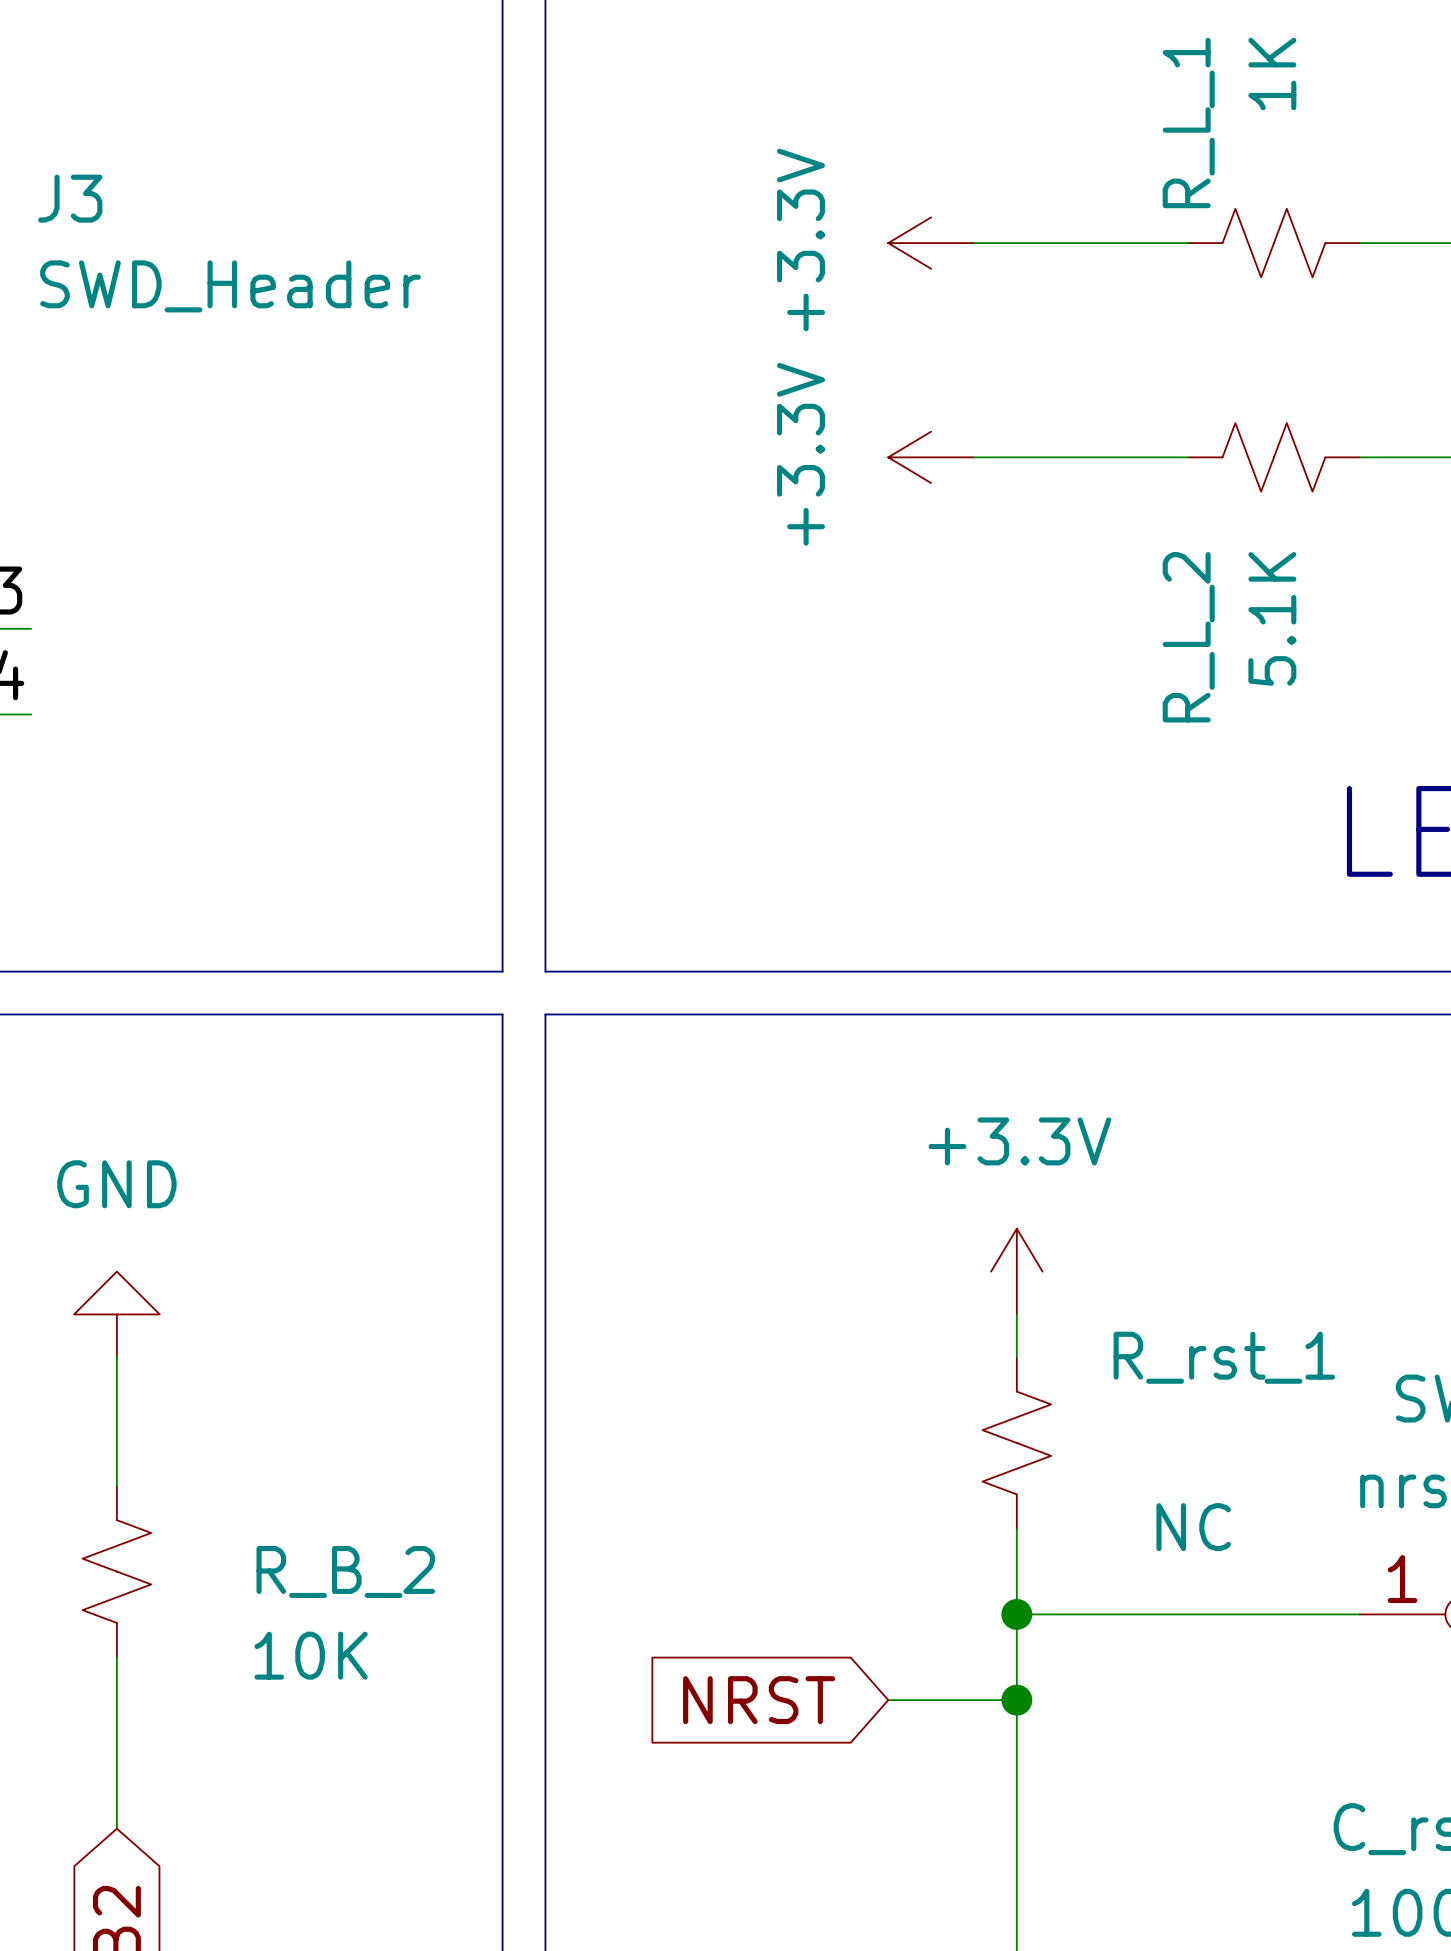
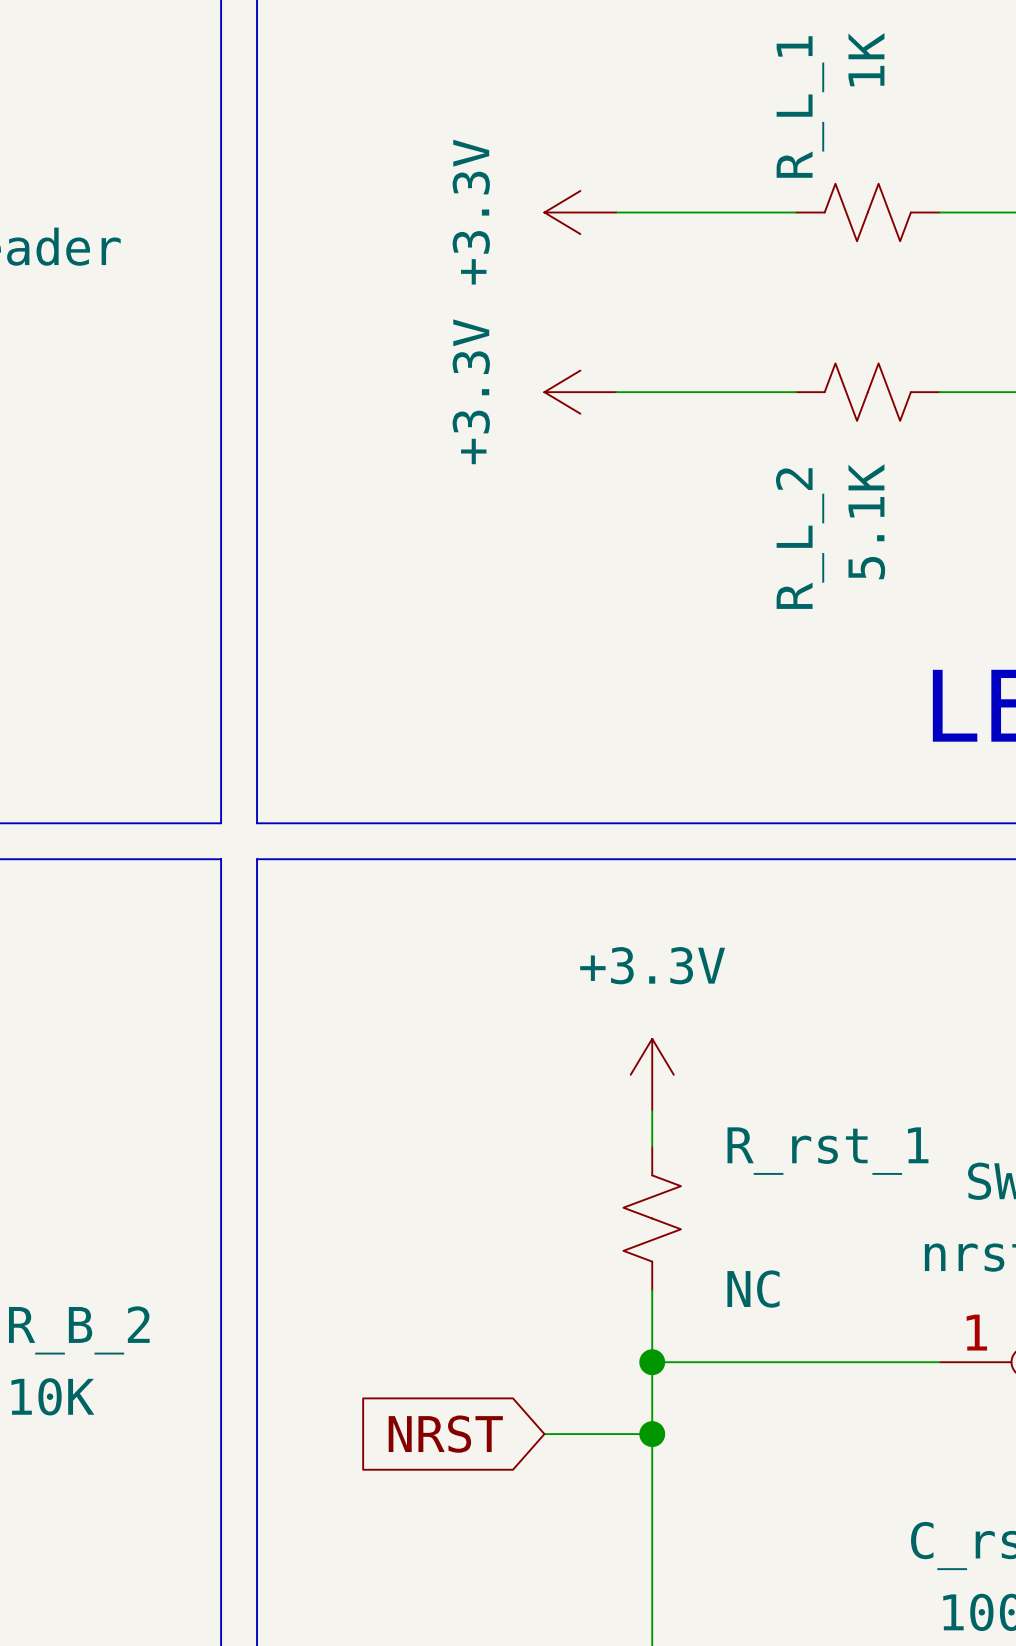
R_rst_1 value position: NC (1193, 1527) -> NC (753, 1289)

